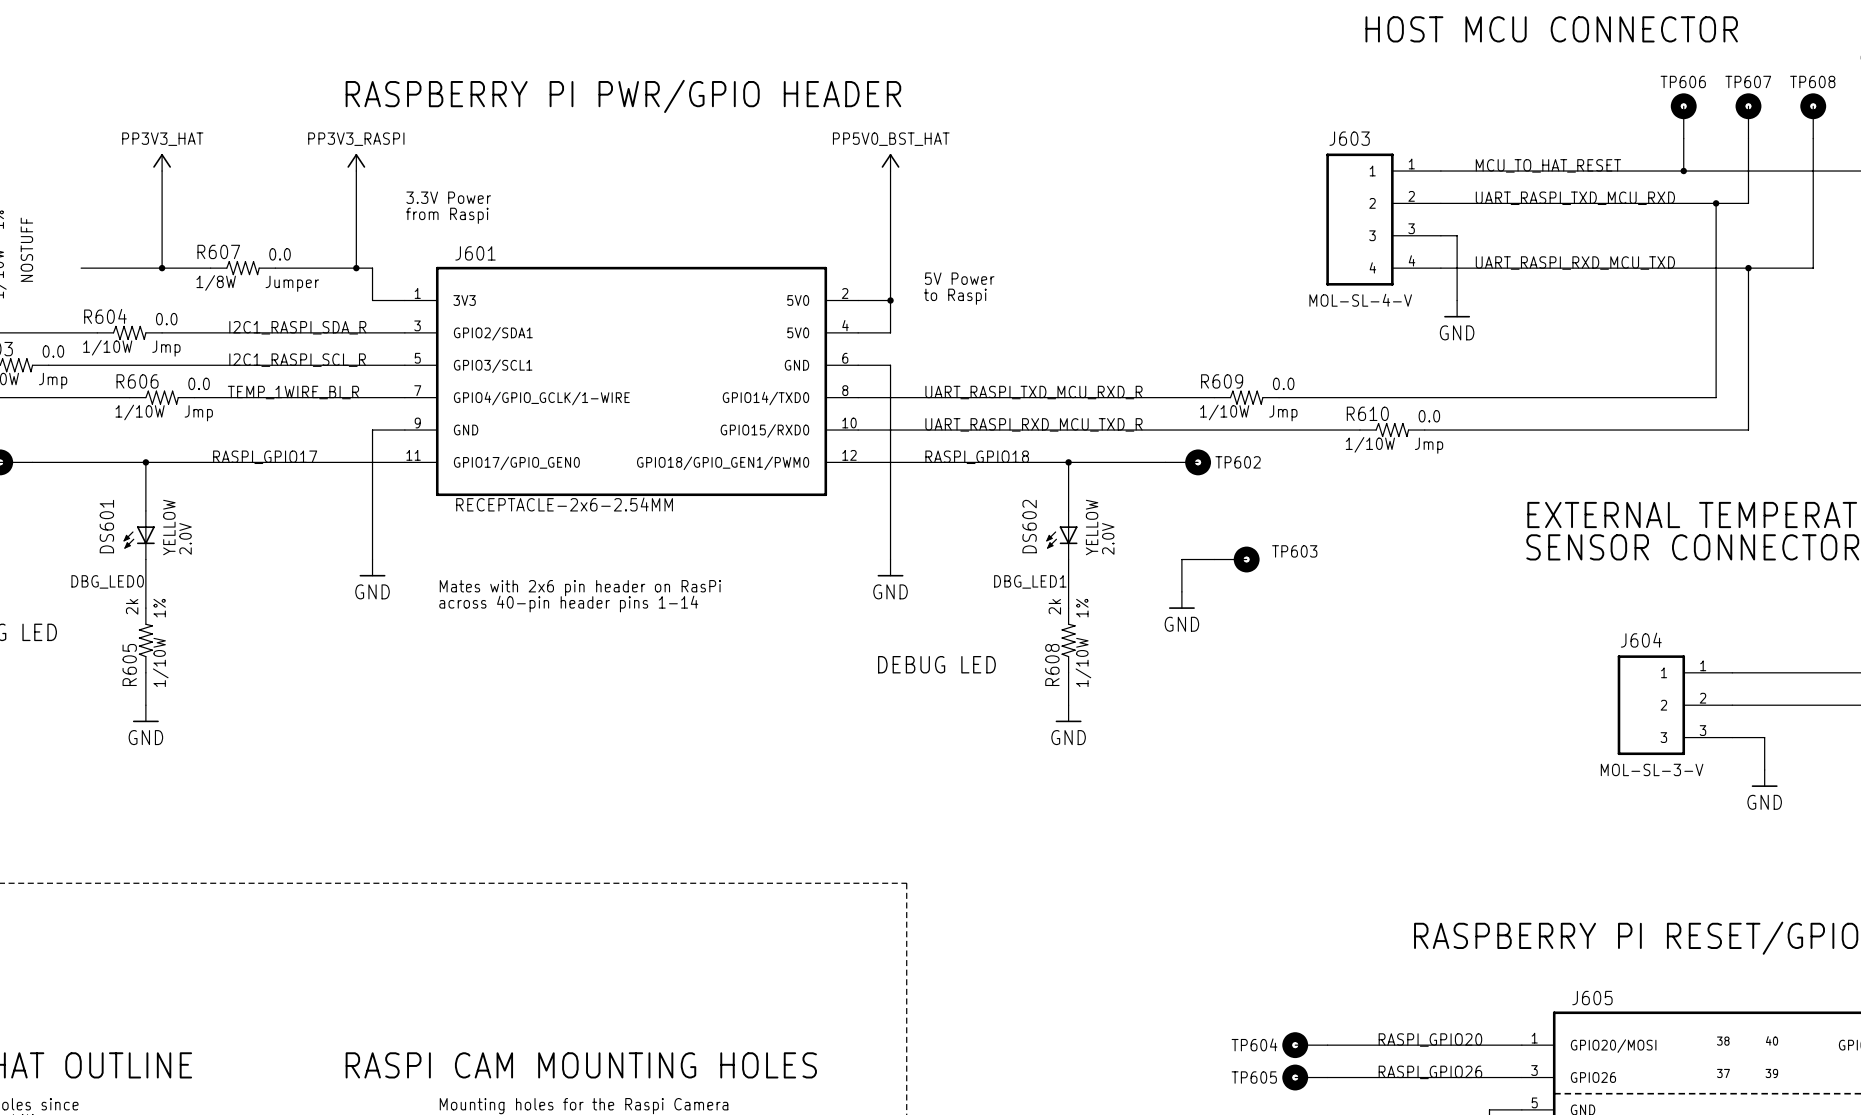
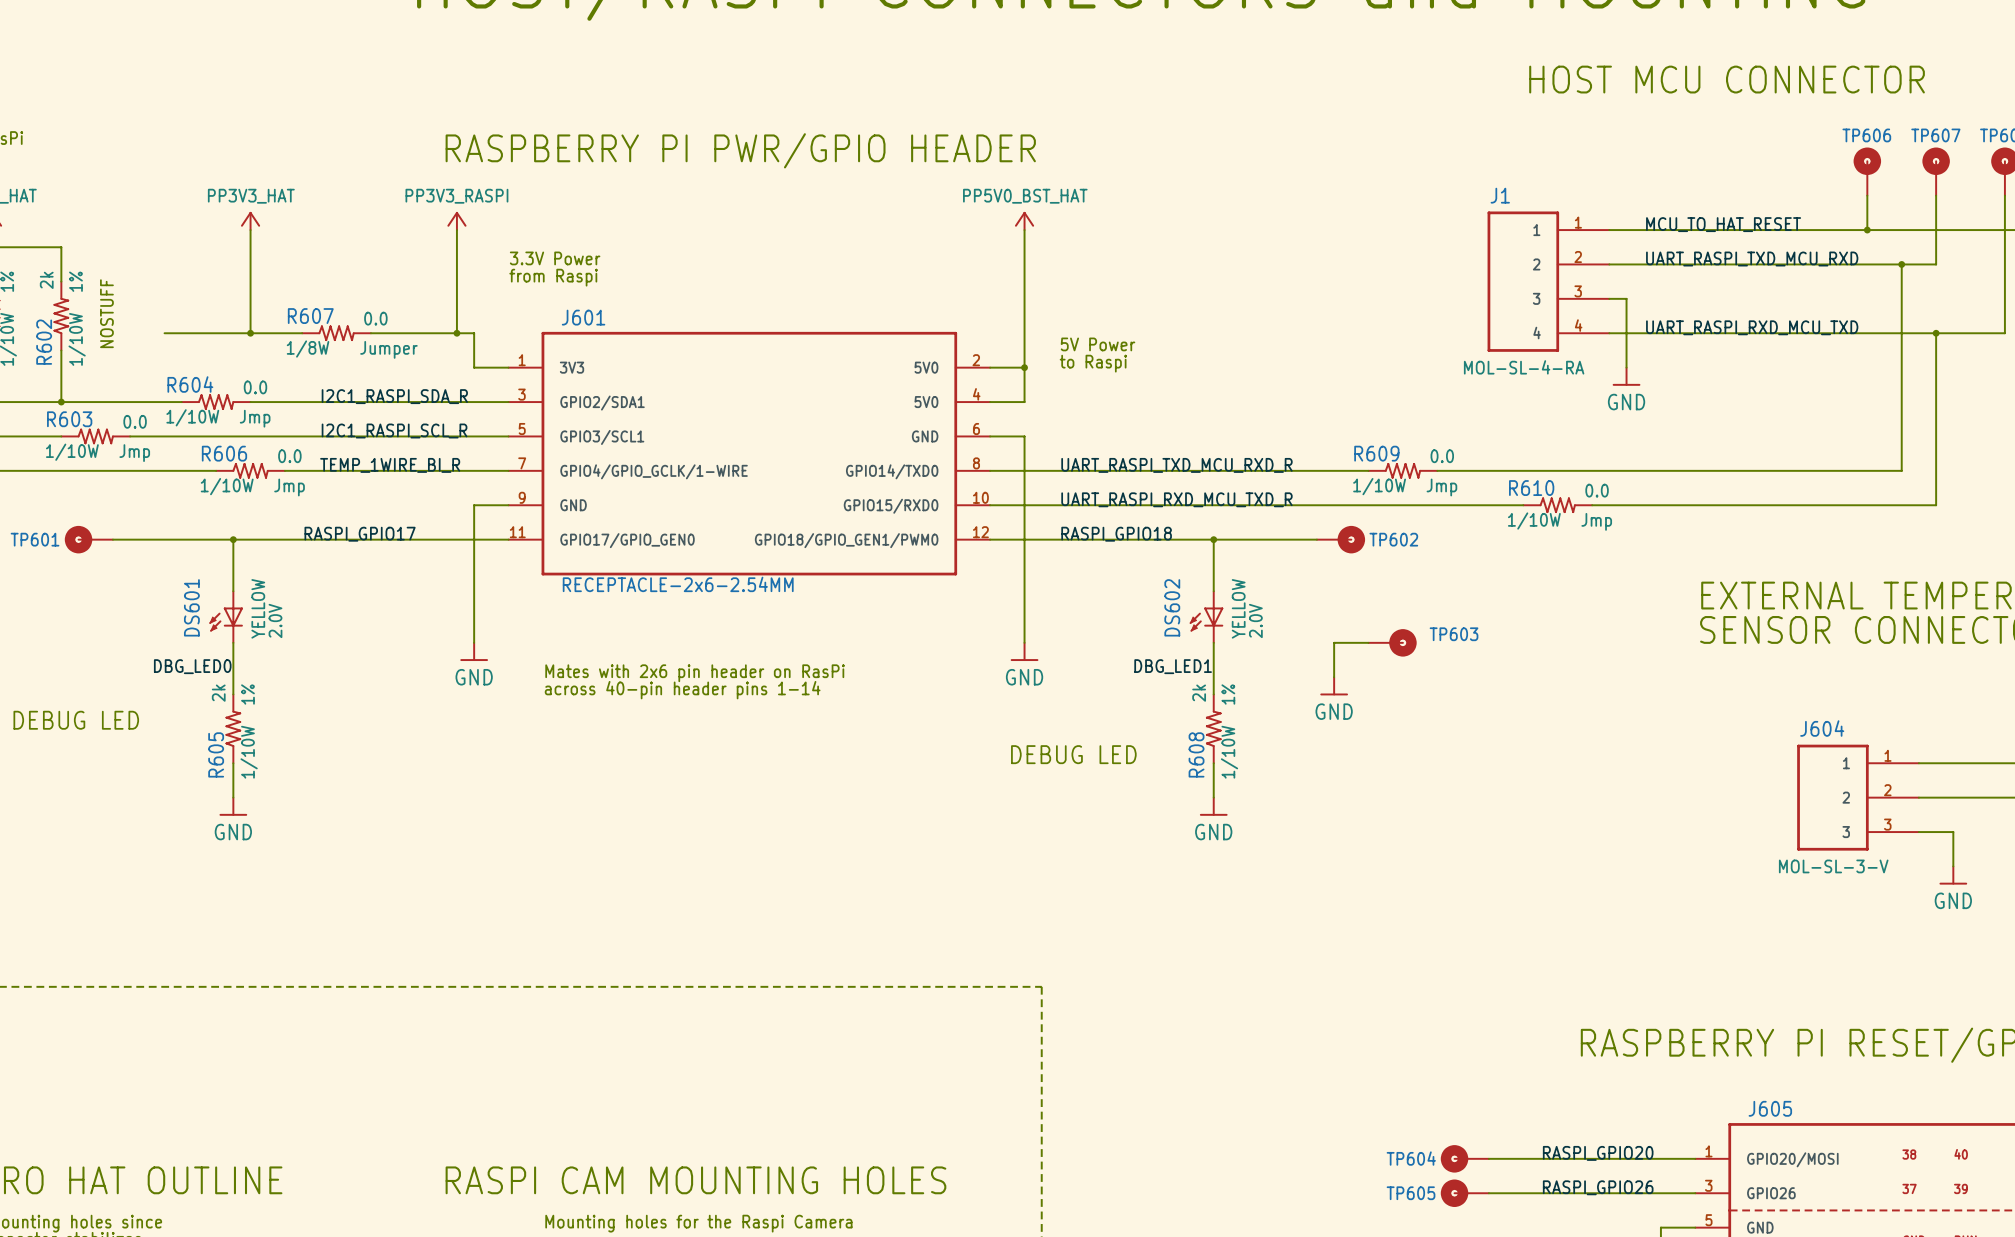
J603 name: J603 (1349, 138) -> J1 (1500, 195)
J603 value: MOL-SL-4-V (1360, 300) -> MOL-SL-4-RA (1524, 367)

